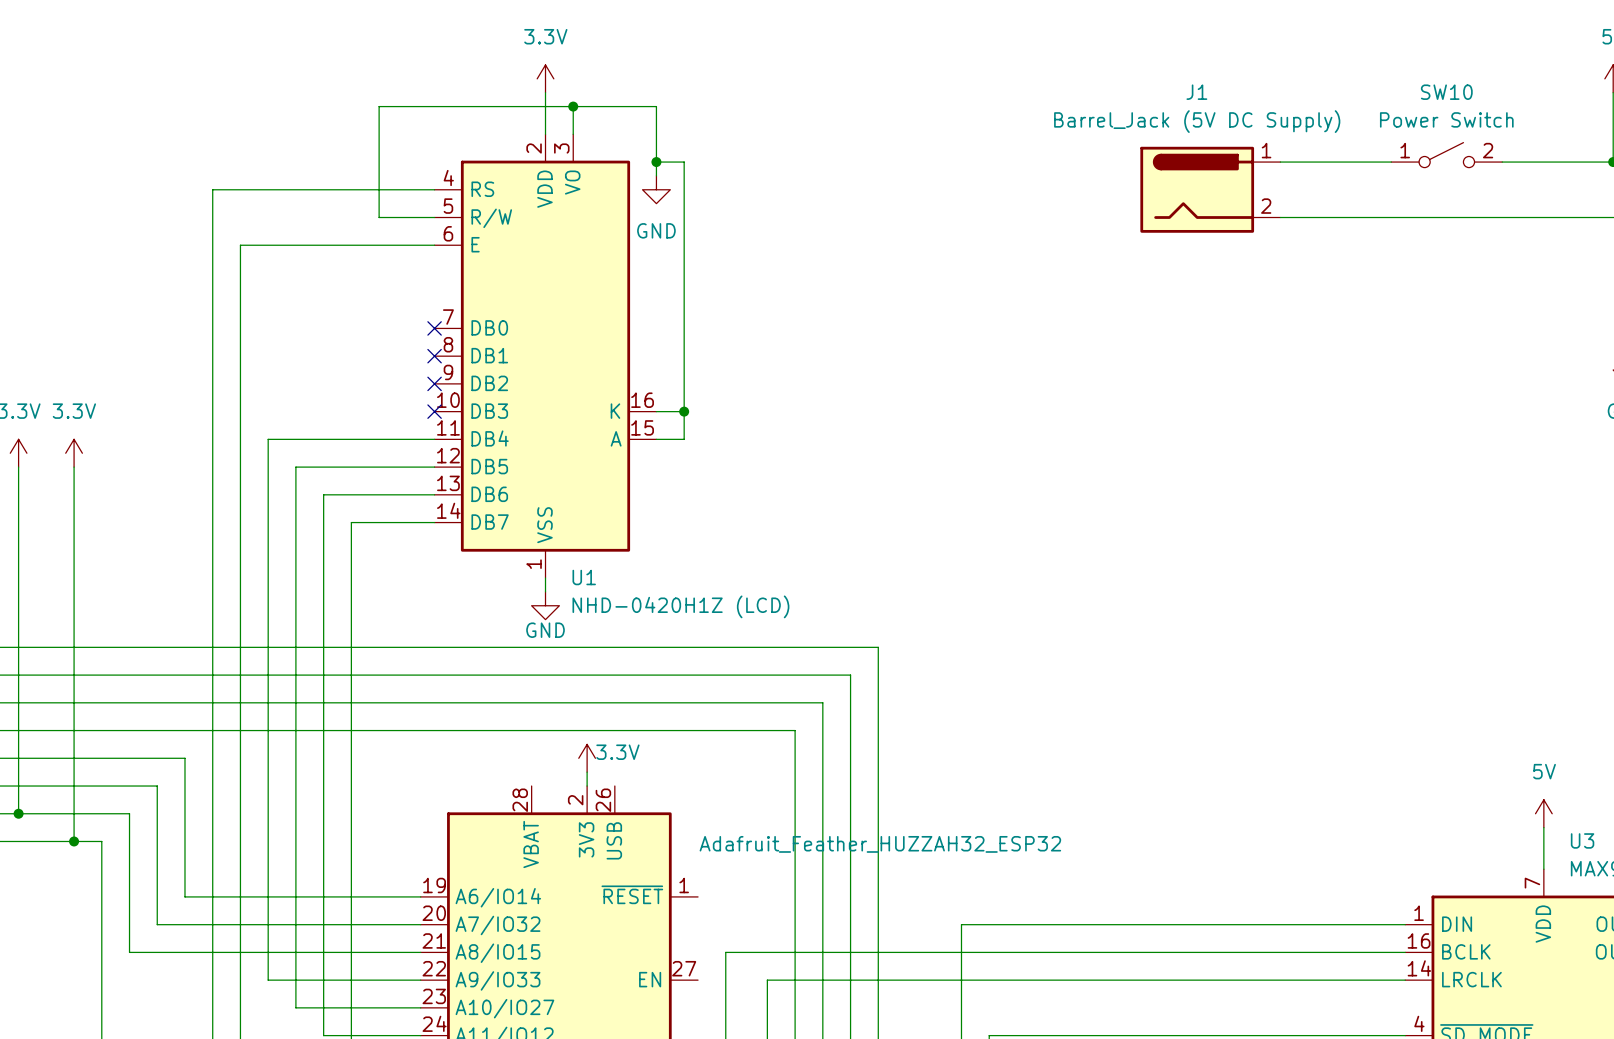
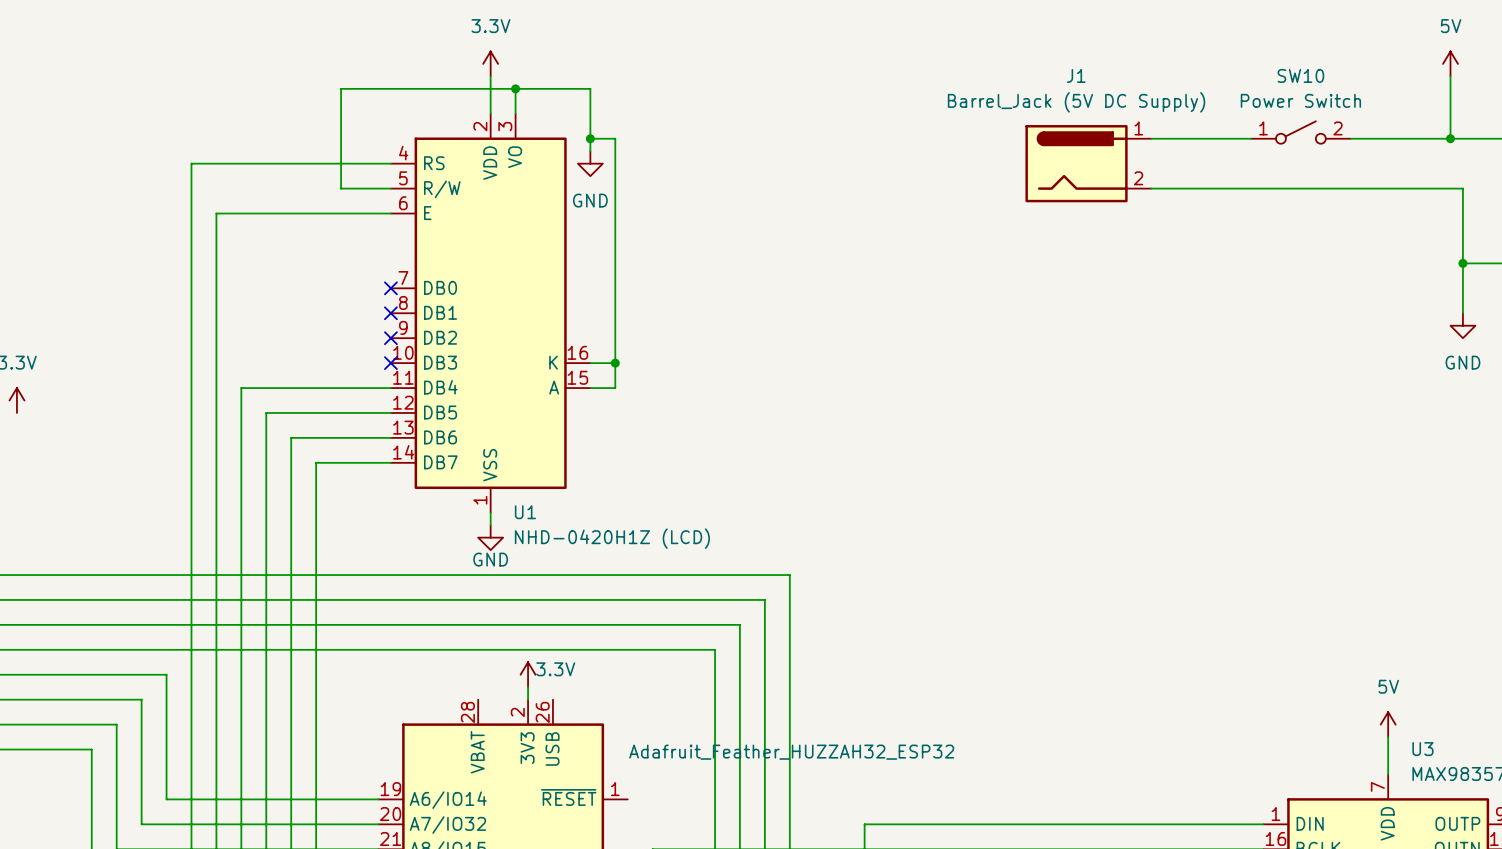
power symbol: 3.3V (74, 453) -> none
wire: (18, 467) (18, 813) -> none
wire: (74, 467) (74, 841) -> none
junction: (18, 813) -> none
junction: (74, 841) -> none

